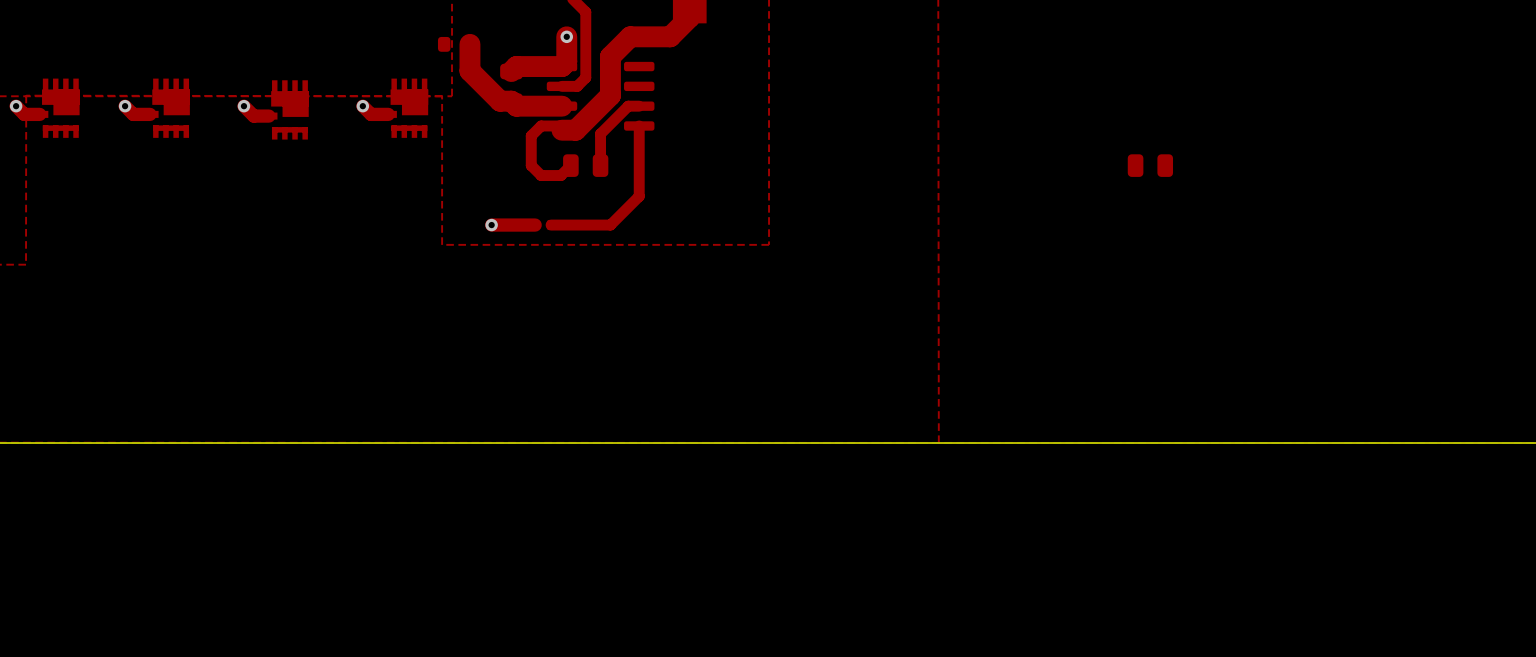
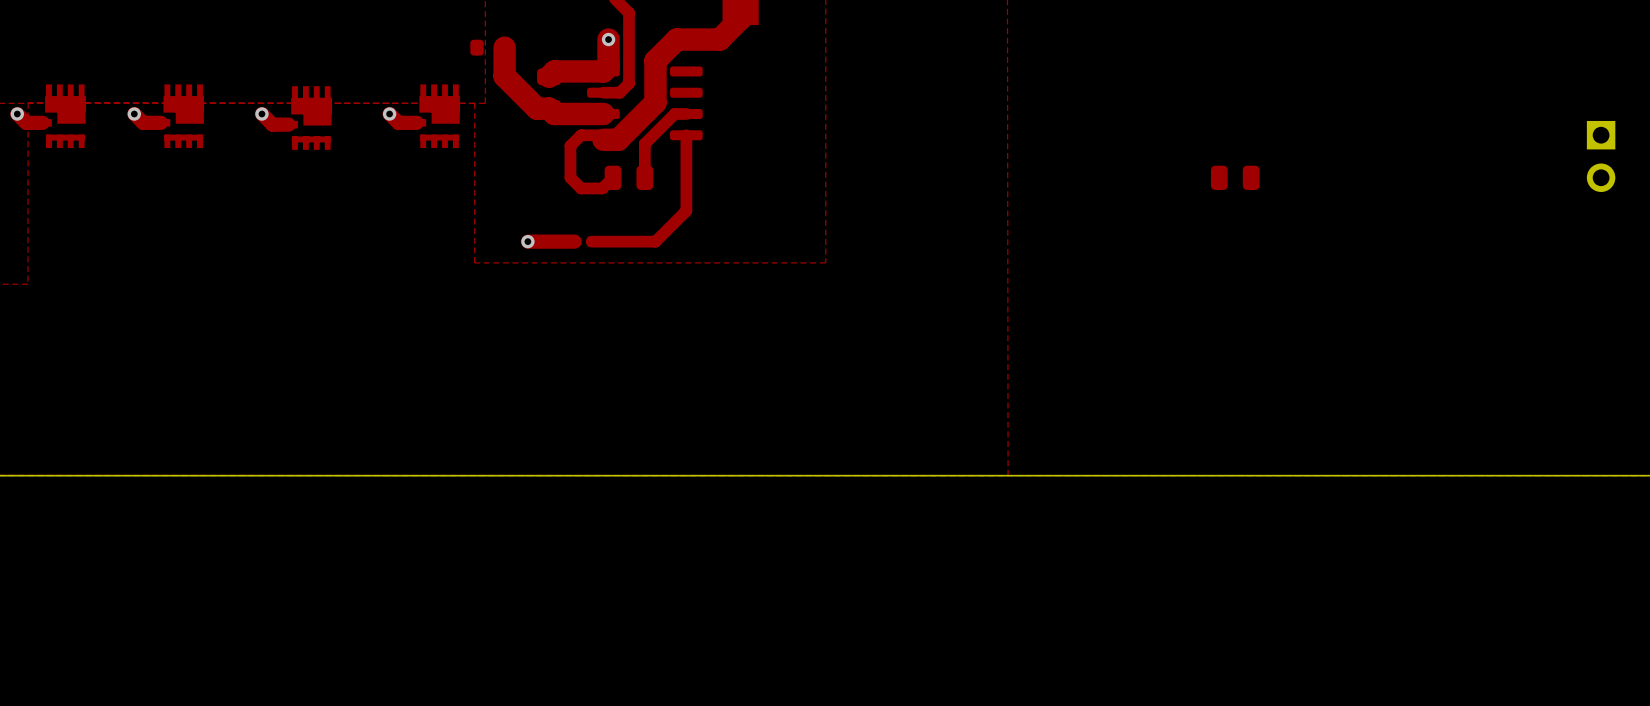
part: none -> (1601, 156)

